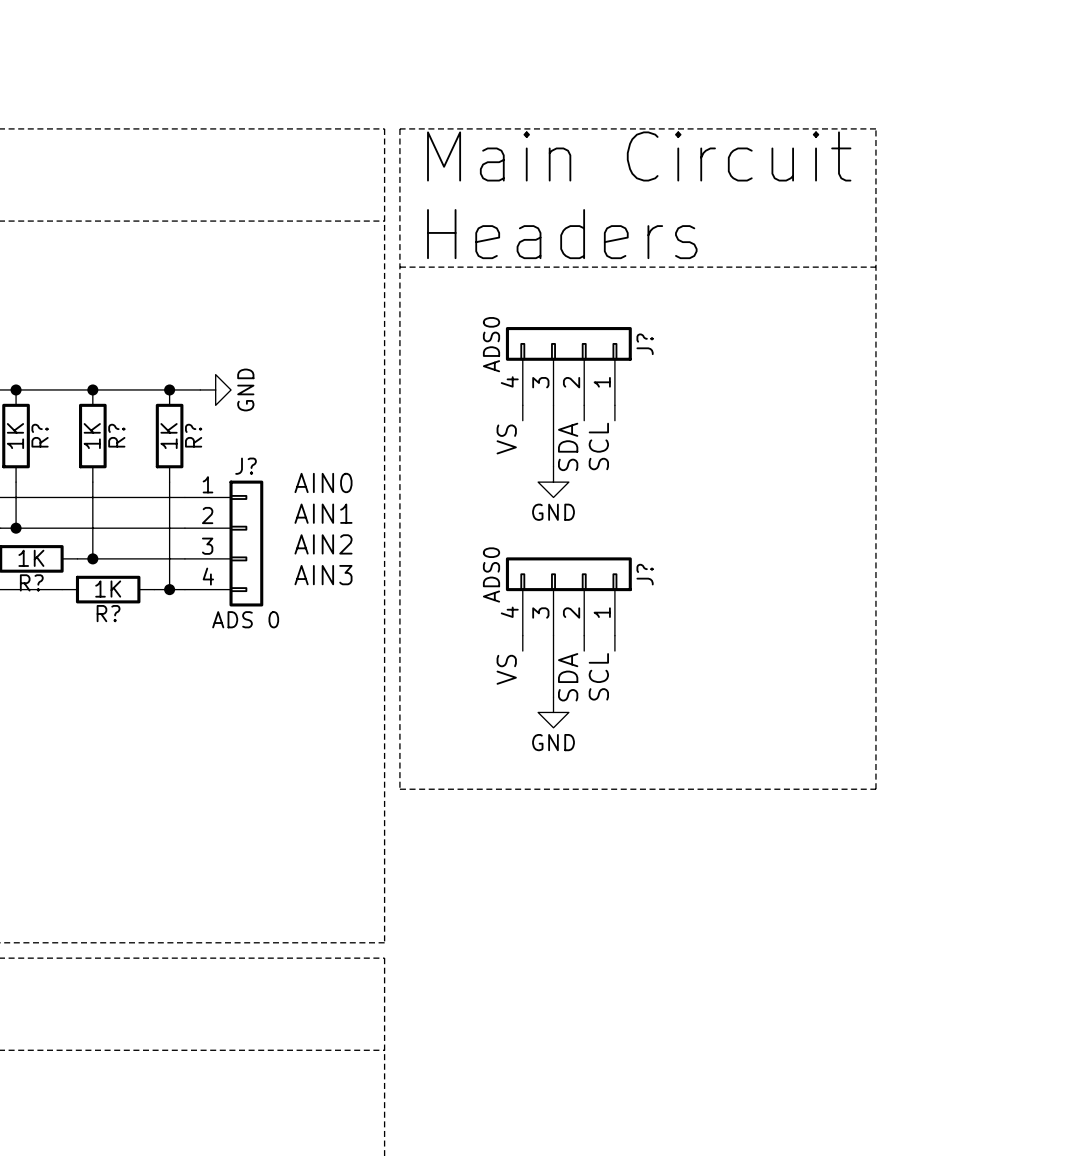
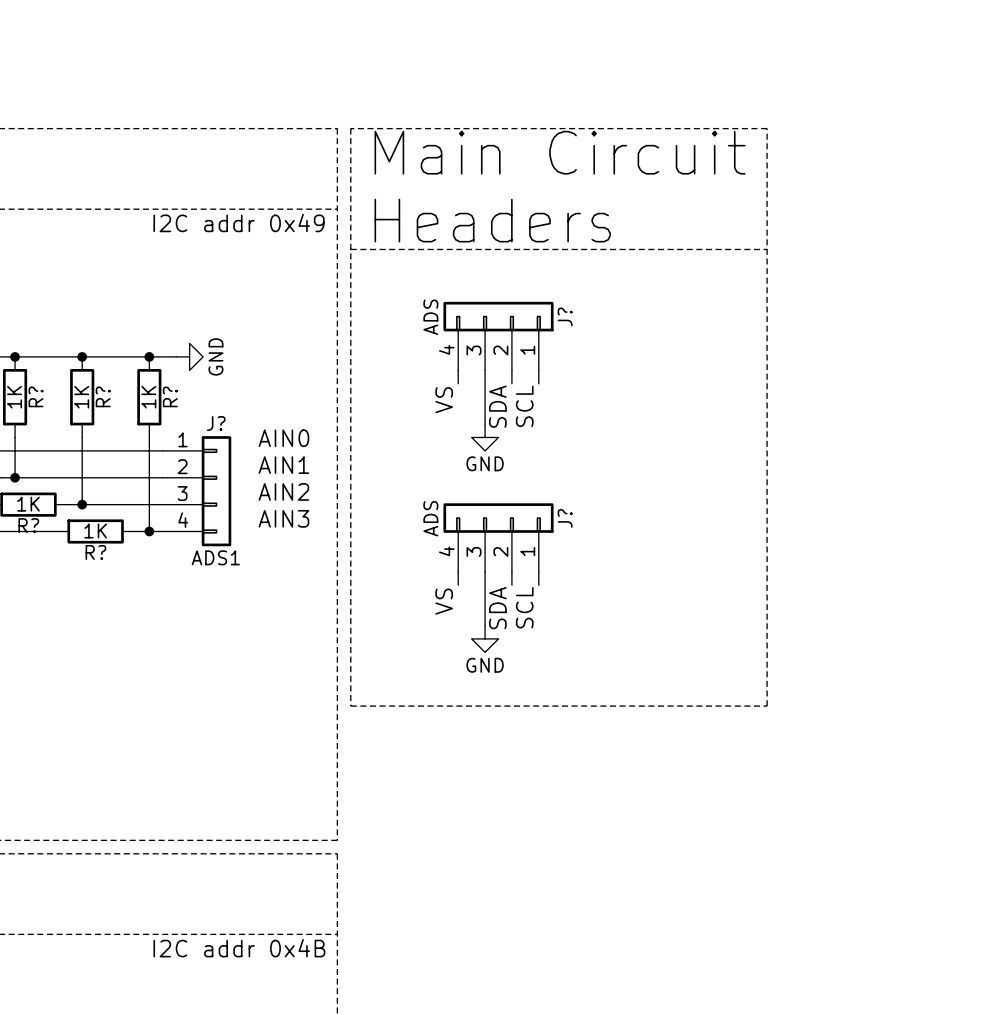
text: none -> I2C addr 0x49 (239, 222)
J? value: ADS0 (491, 344) -> ADS (430, 317)
J? value: ADS0 (491, 574) -> ADS (430, 518)
J? value: ADS 0 (245, 619) -> ADS1 (215, 557)
text: none -> I2C addr 0x4B (239, 948)

